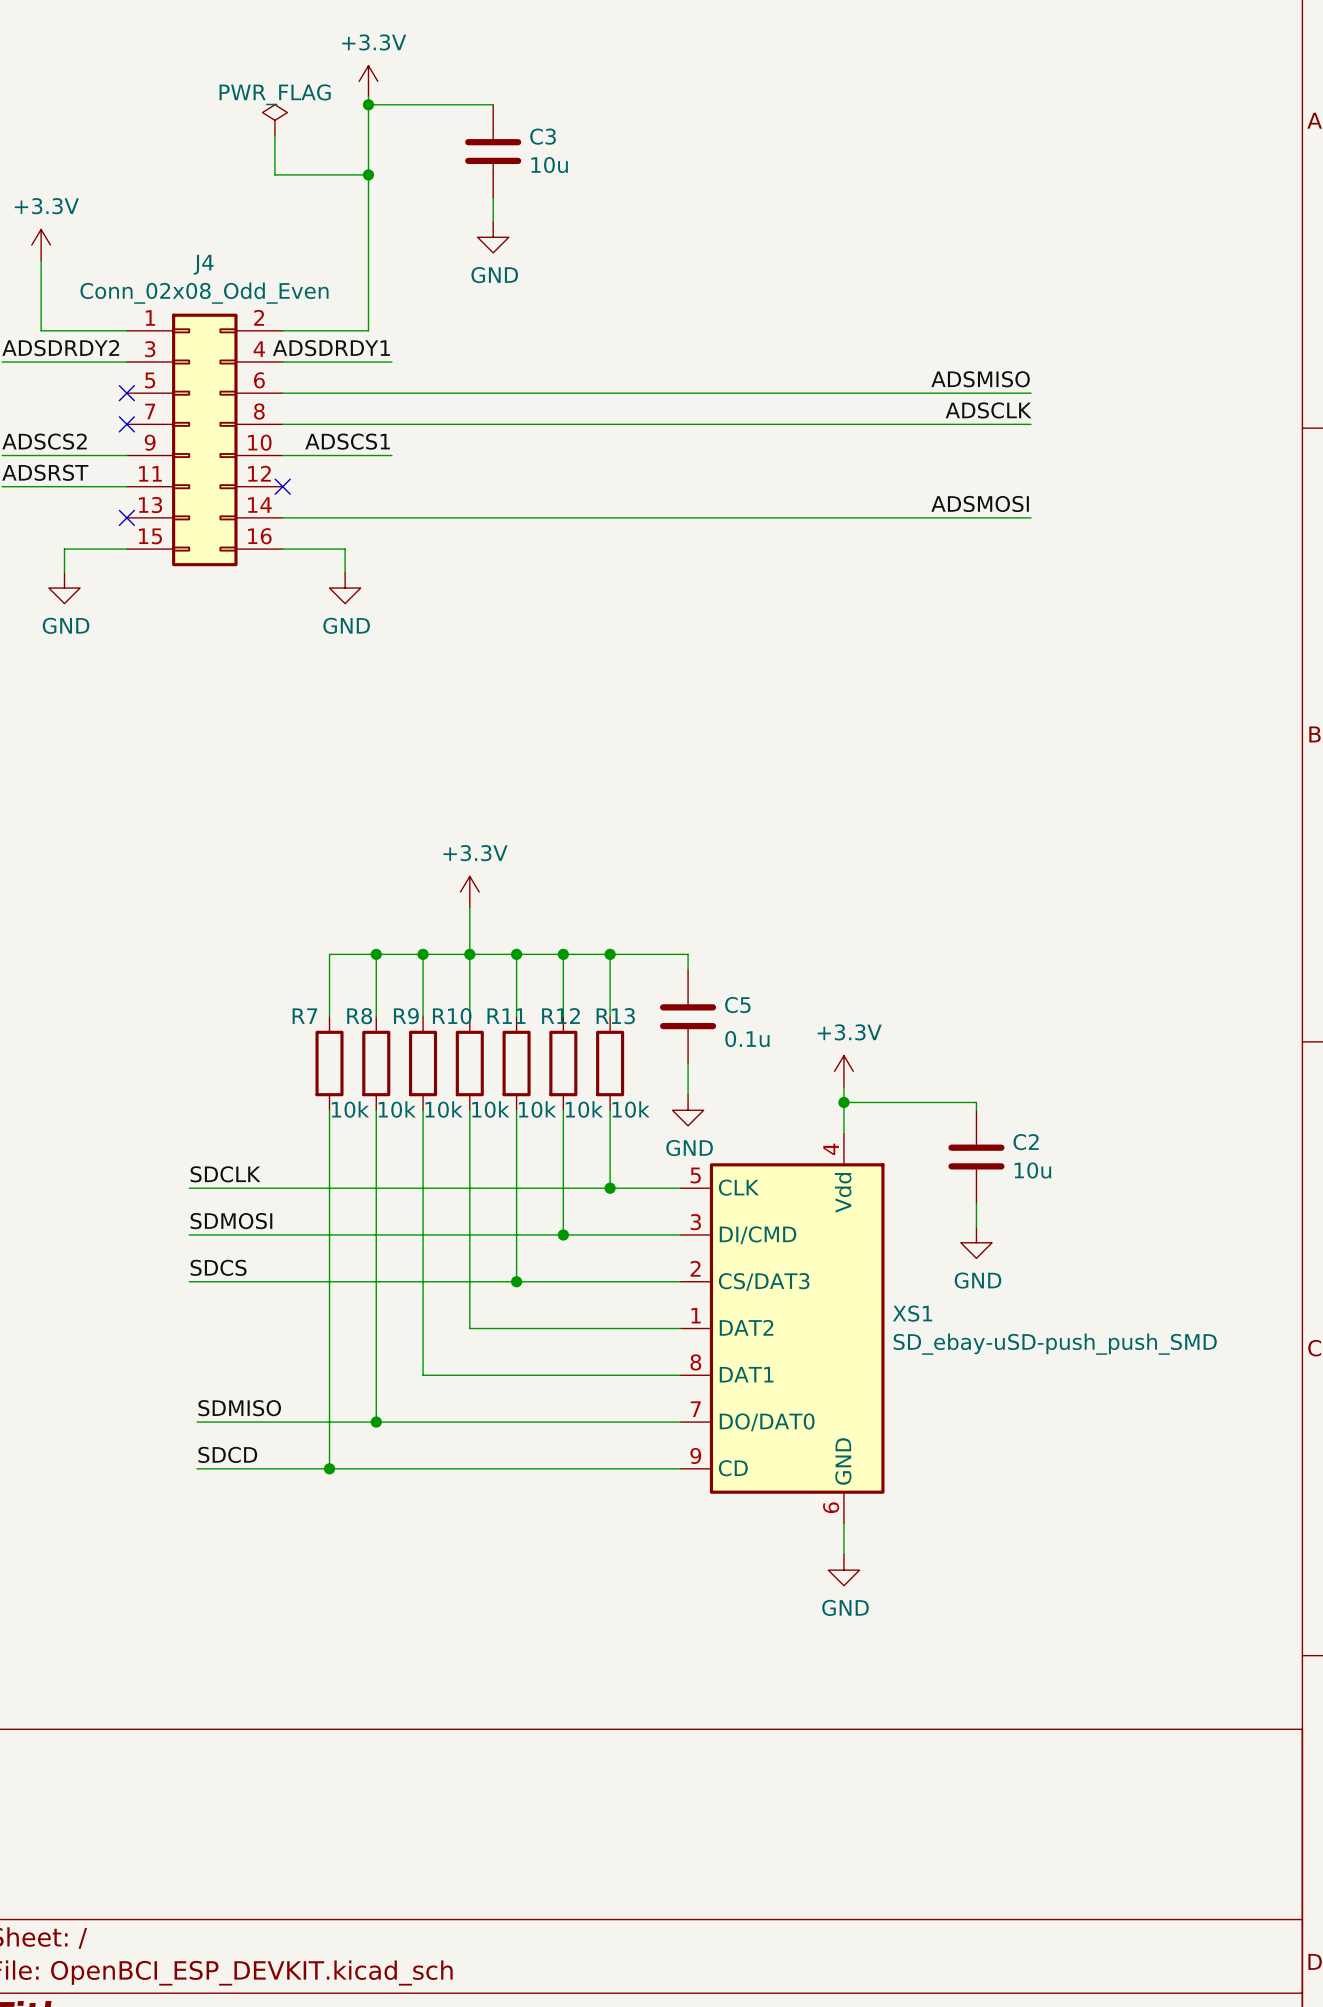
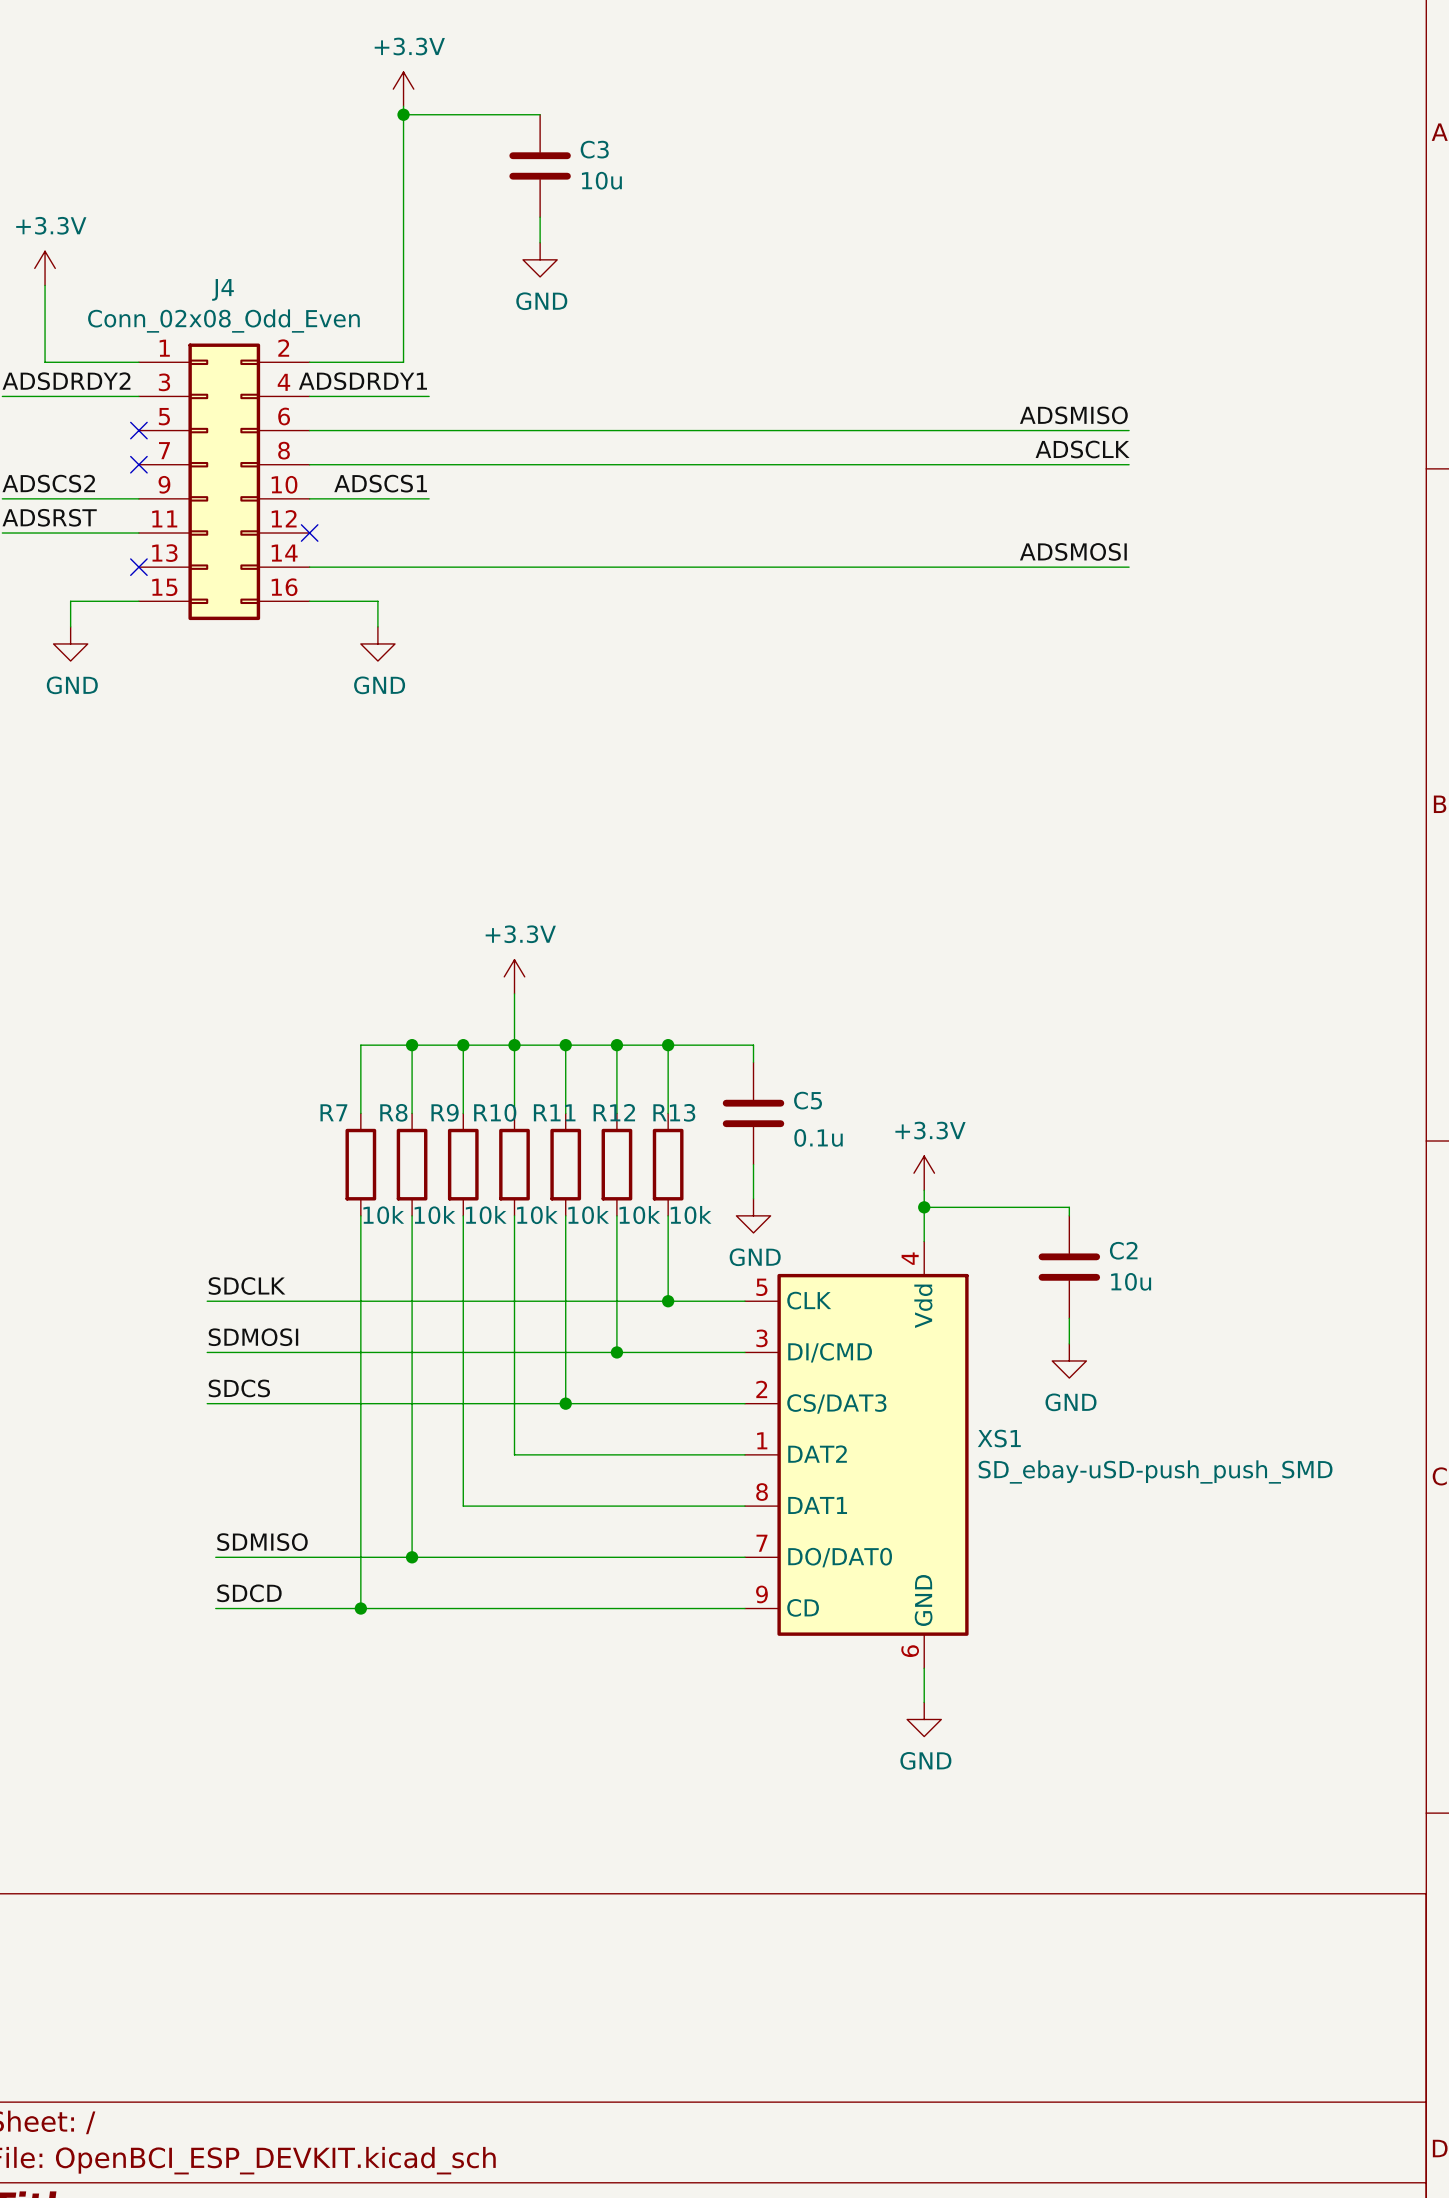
power symbol: PWR_FLAG (274, 120) -> none
wire: (274, 135) (274, 174) (368, 174) -> none
junction: (368, 174) -> none

